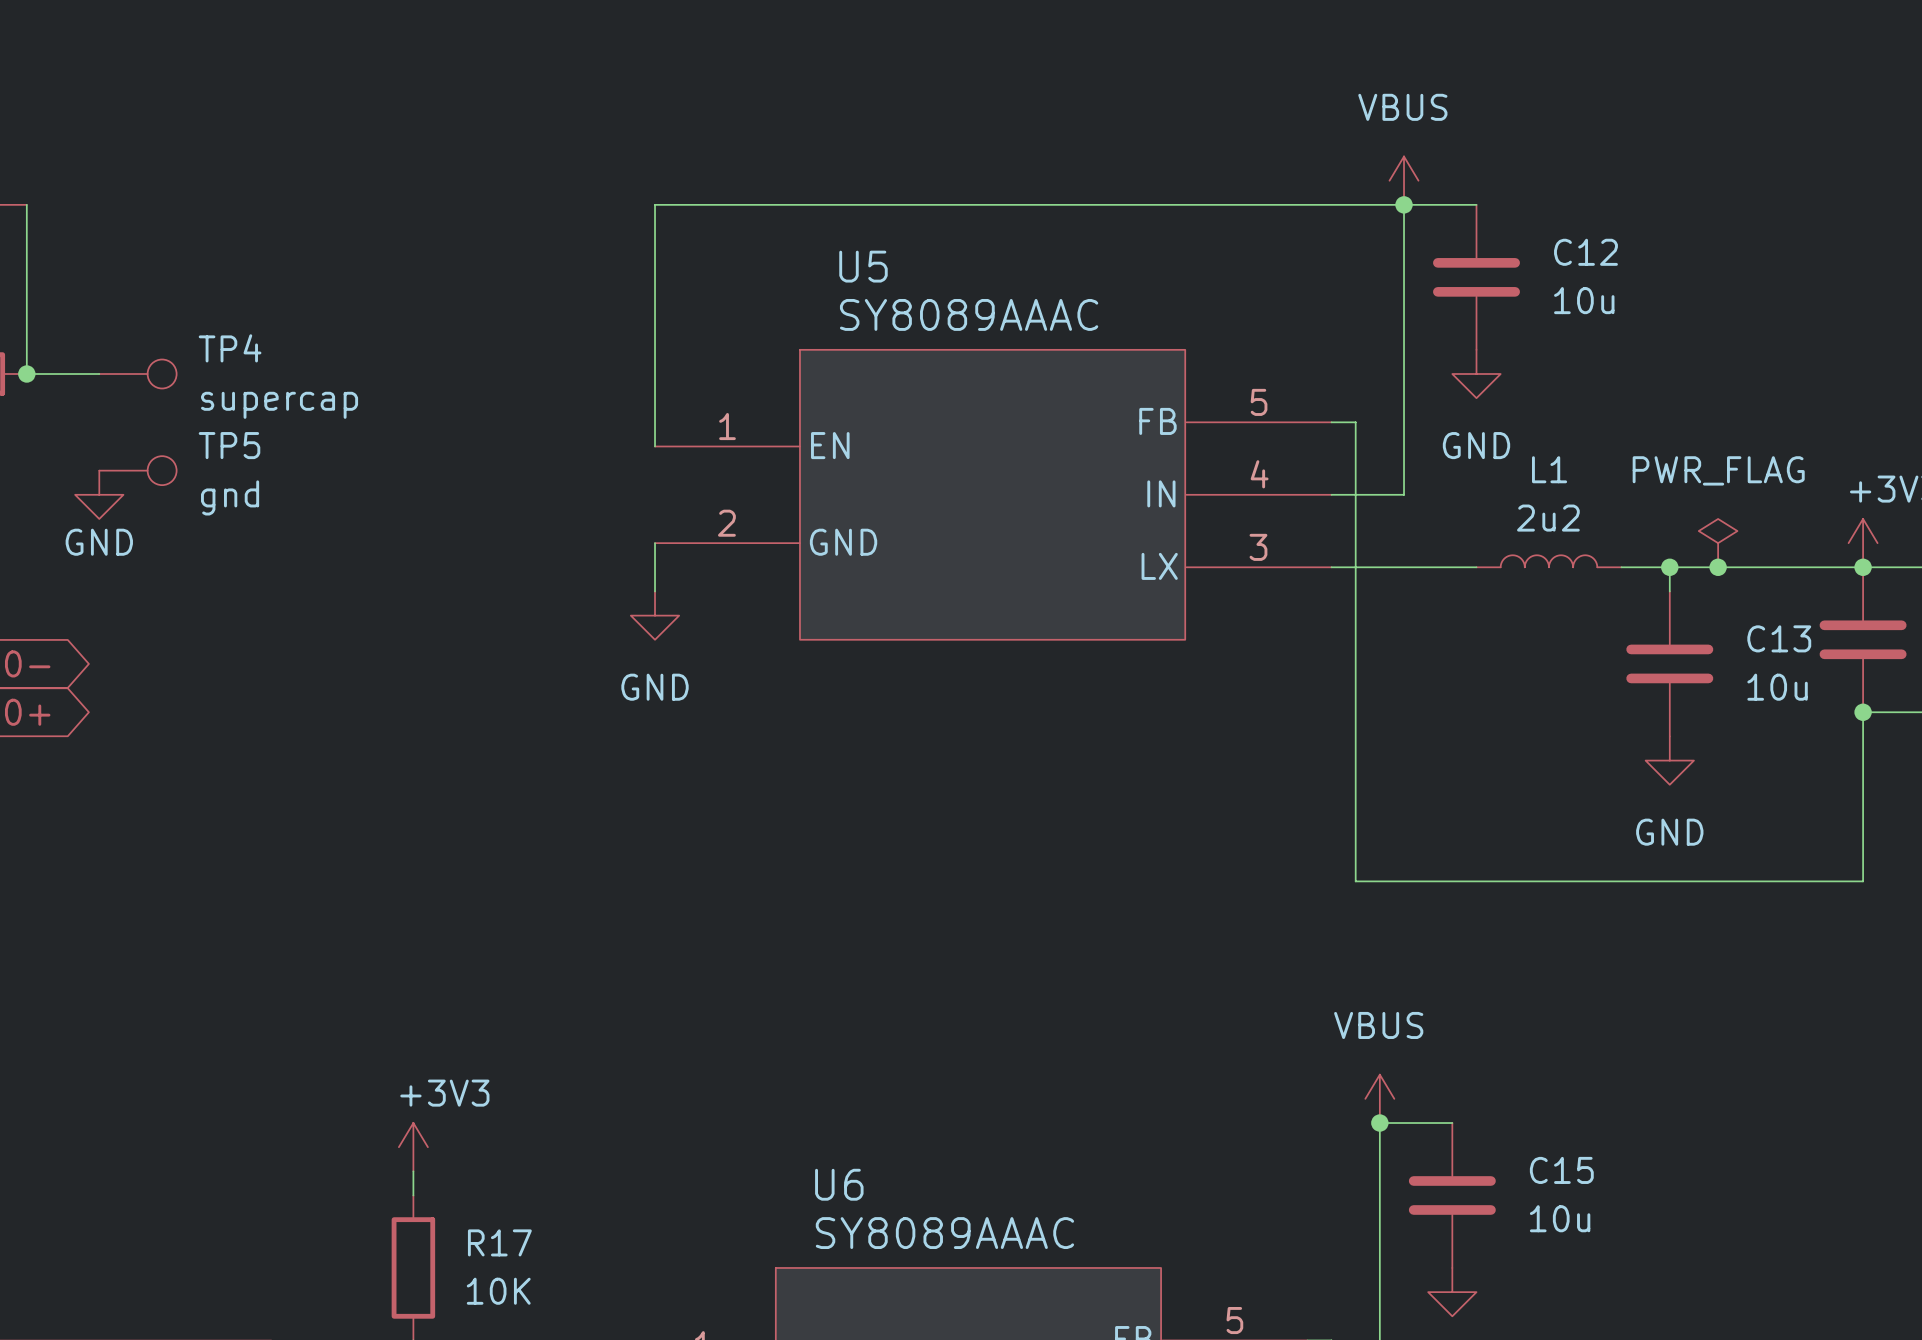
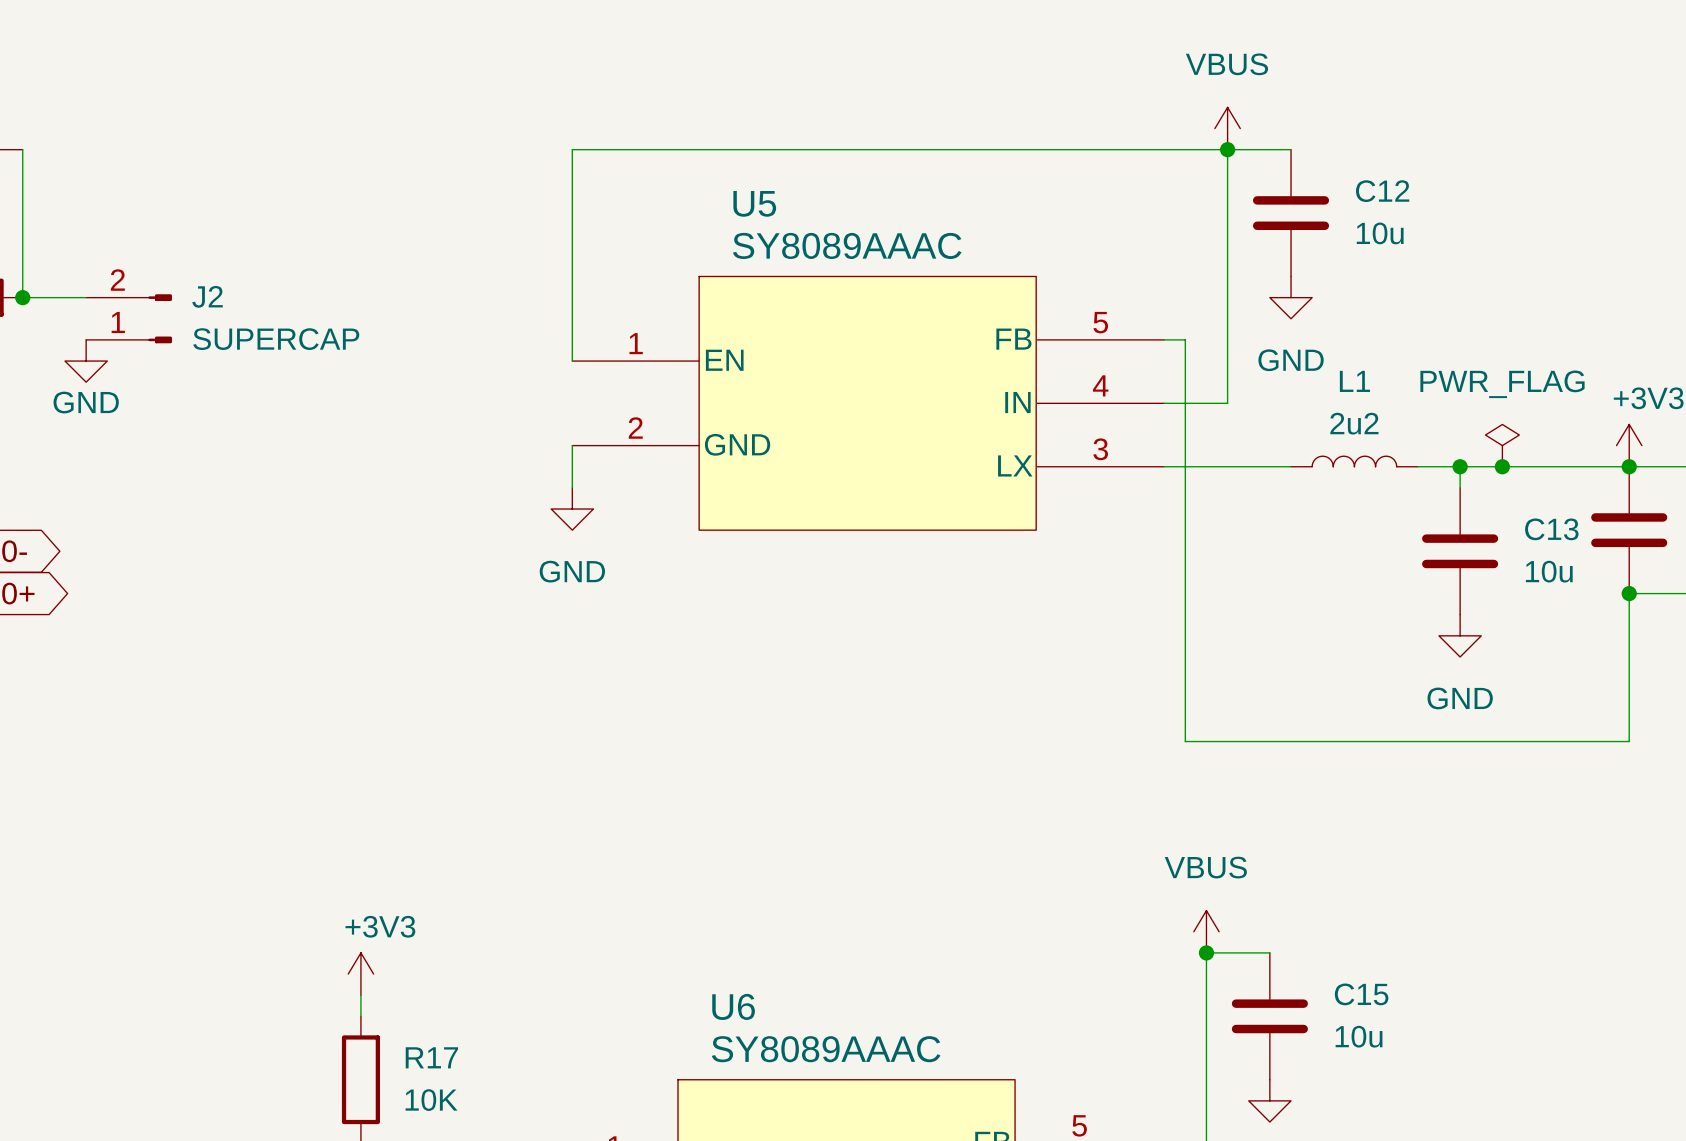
TP4: supercap (137, 374) -> none
J2: none -> SUPERCAP (129, 318)
TP5: gnd (137, 470) -> none
power symbol position: GND (99, 494) -> GND (86, 361)

